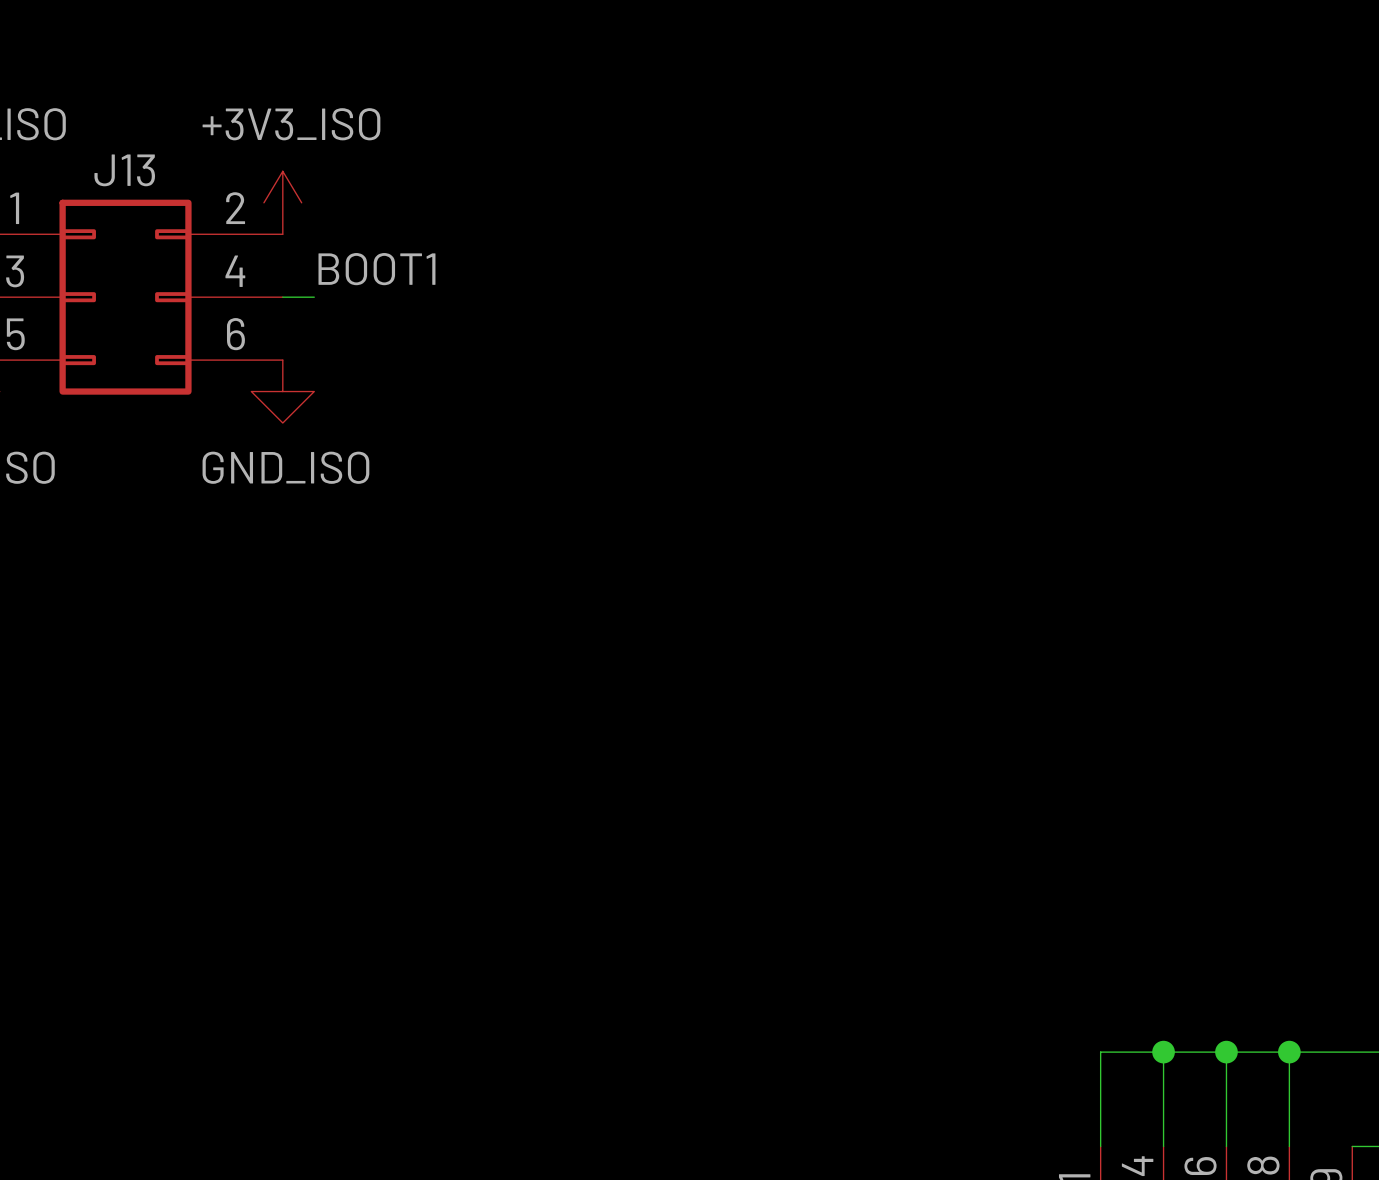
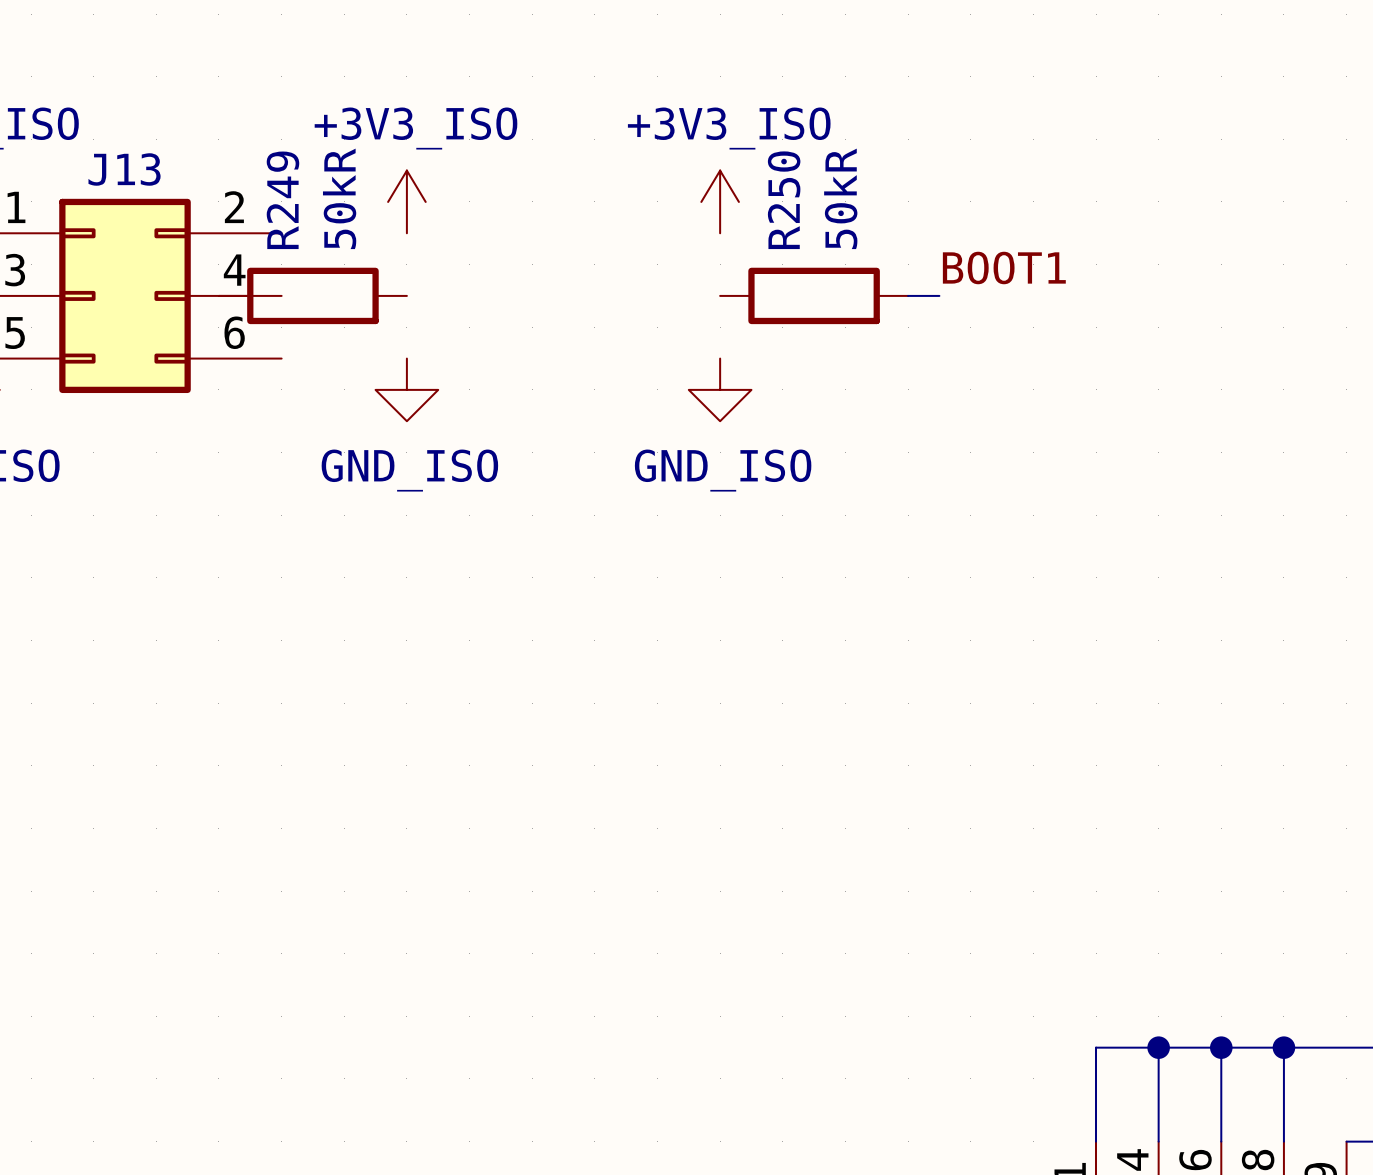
power symbol position: +3V3_ISO (282, 202) -> +3V3_ISO (406, 201)
power symbol: none -> +3V3_ISO (720, 201)
label: BOOT1 (376, 269) -> none
label: none -> BOOT1 (1004, 267)
wire: (282, 297) (314, 297) -> none
R249: none -> 50kR (312, 295)
R250: none -> 50kR (814, 295)
wire: none -> (908, 295) (939, 295)
power symbol position: GND_ISO (282, 391) -> GND_ISO (406, 389)
power symbol: none -> GND_ISO (720, 389)

